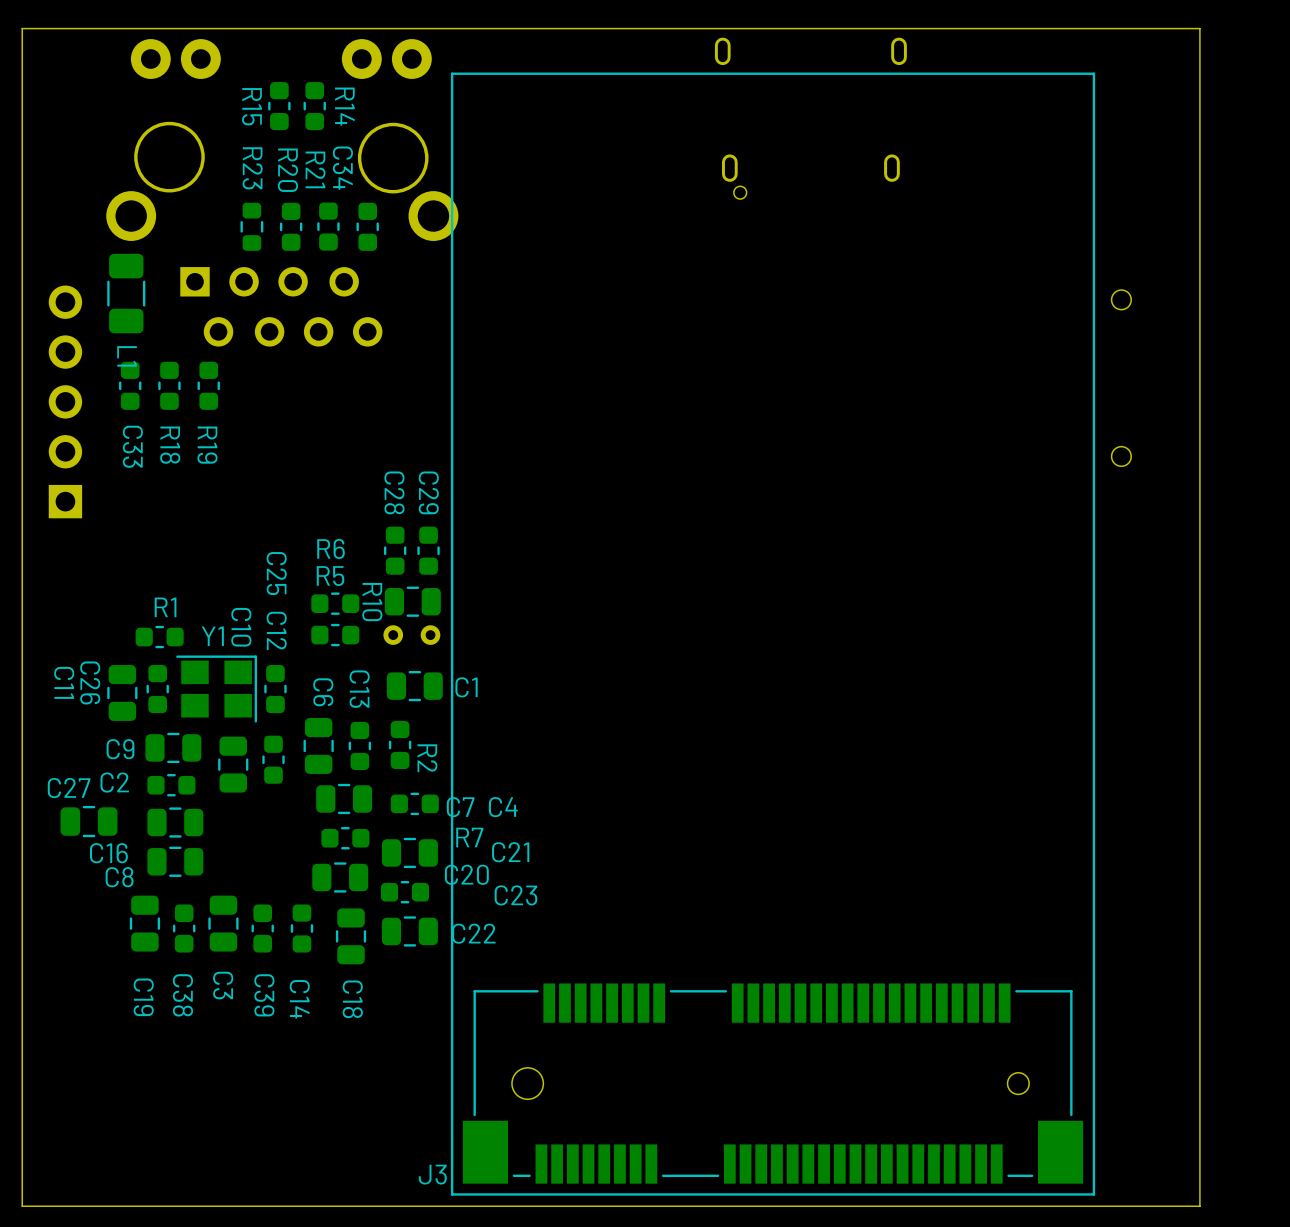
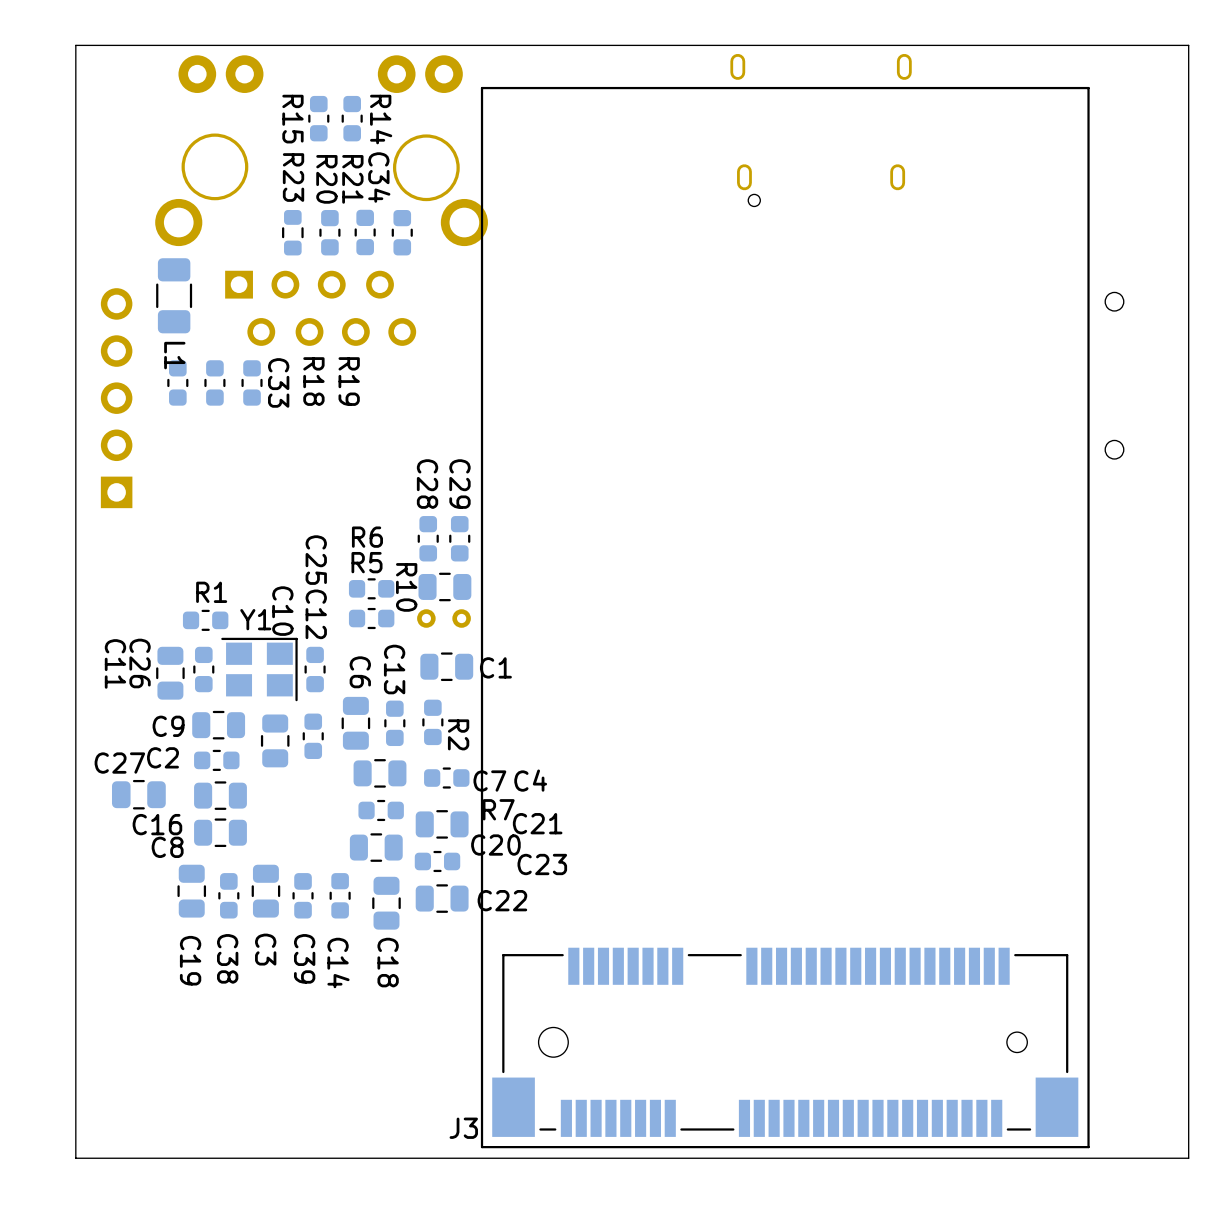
R18 name position: R18 (170, 445) -> R18 (313, 381)
R19 name position: R19 (207, 445) -> R19 (349, 381)
C33 name position: C33 (132, 446) -> C33 (278, 382)

